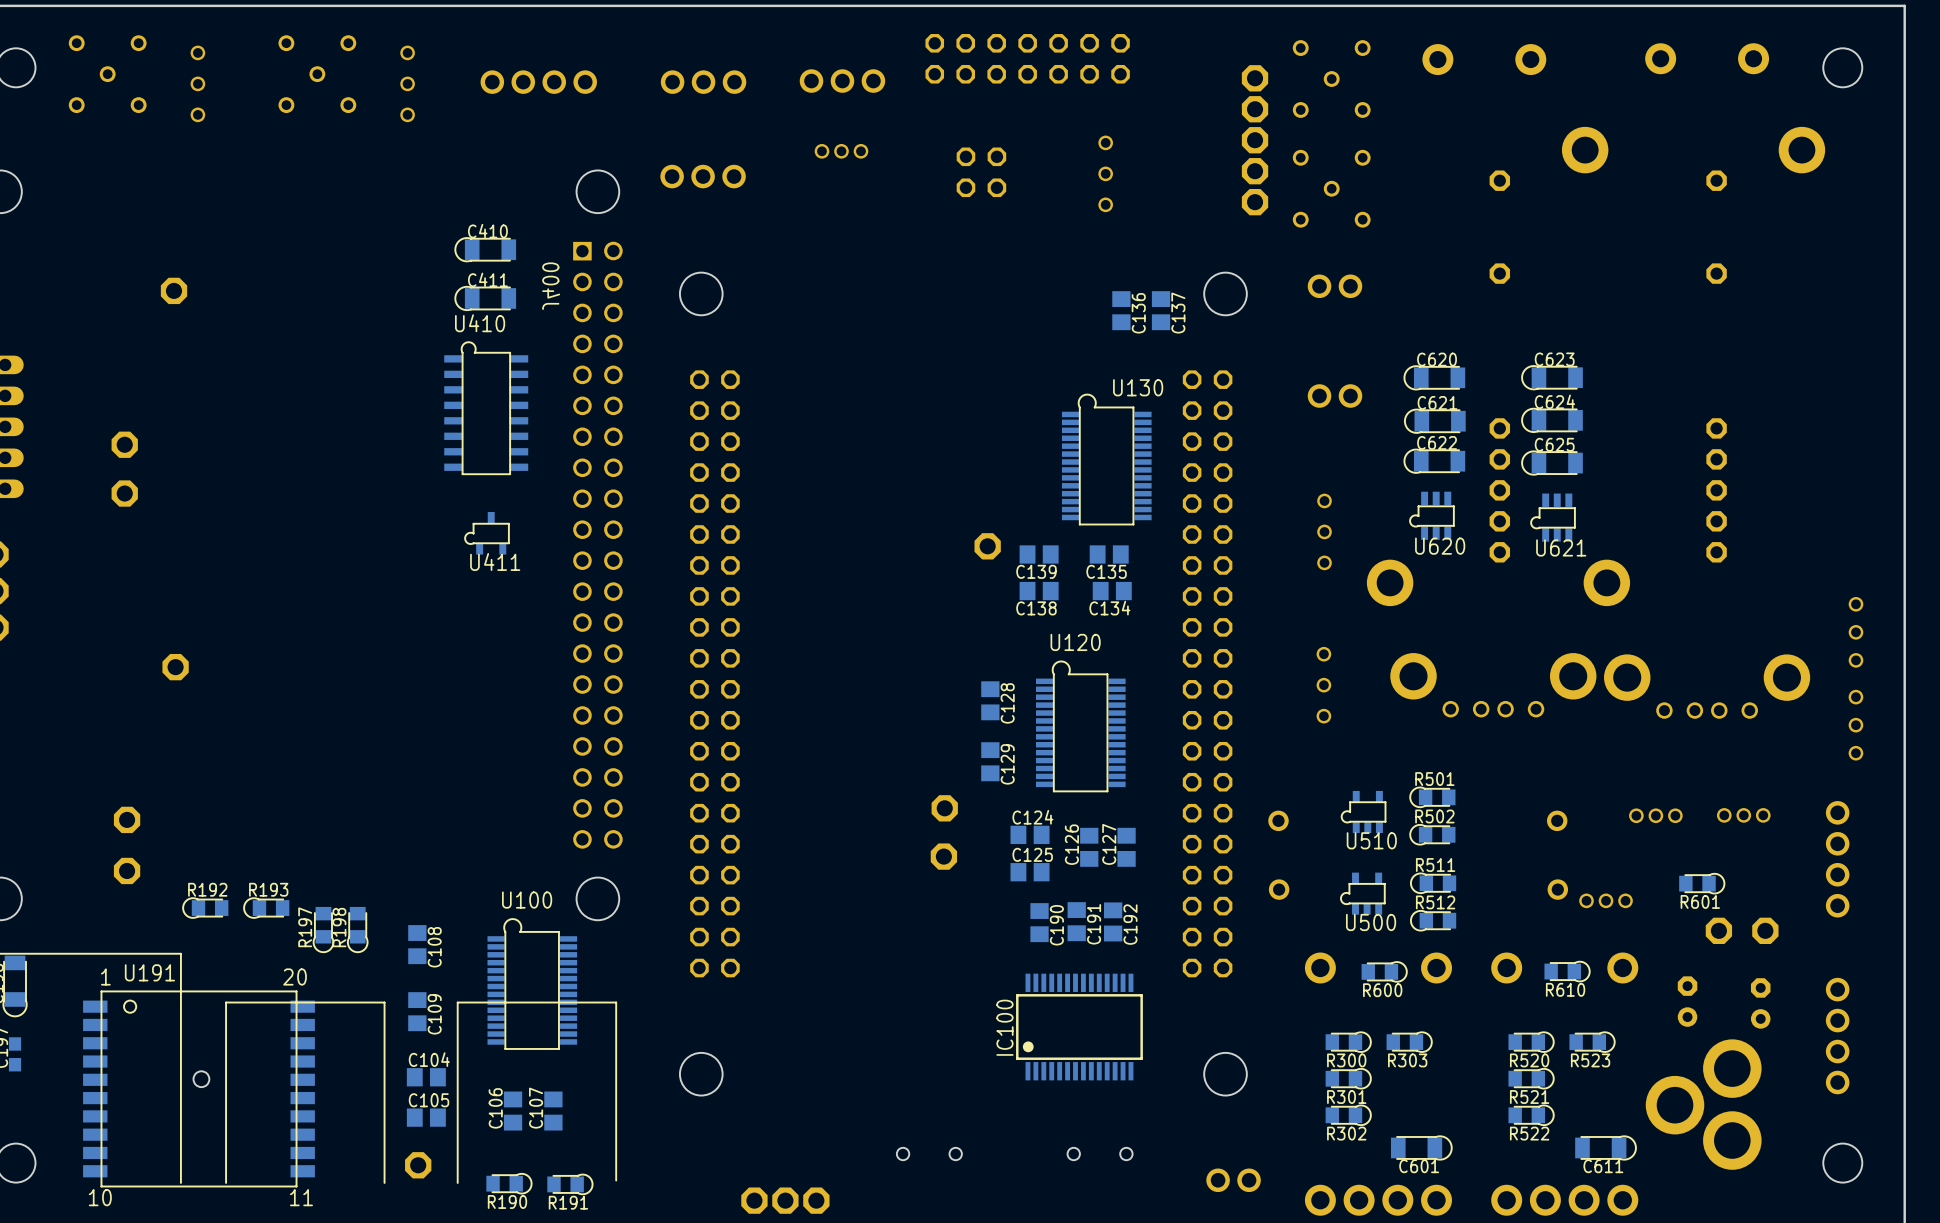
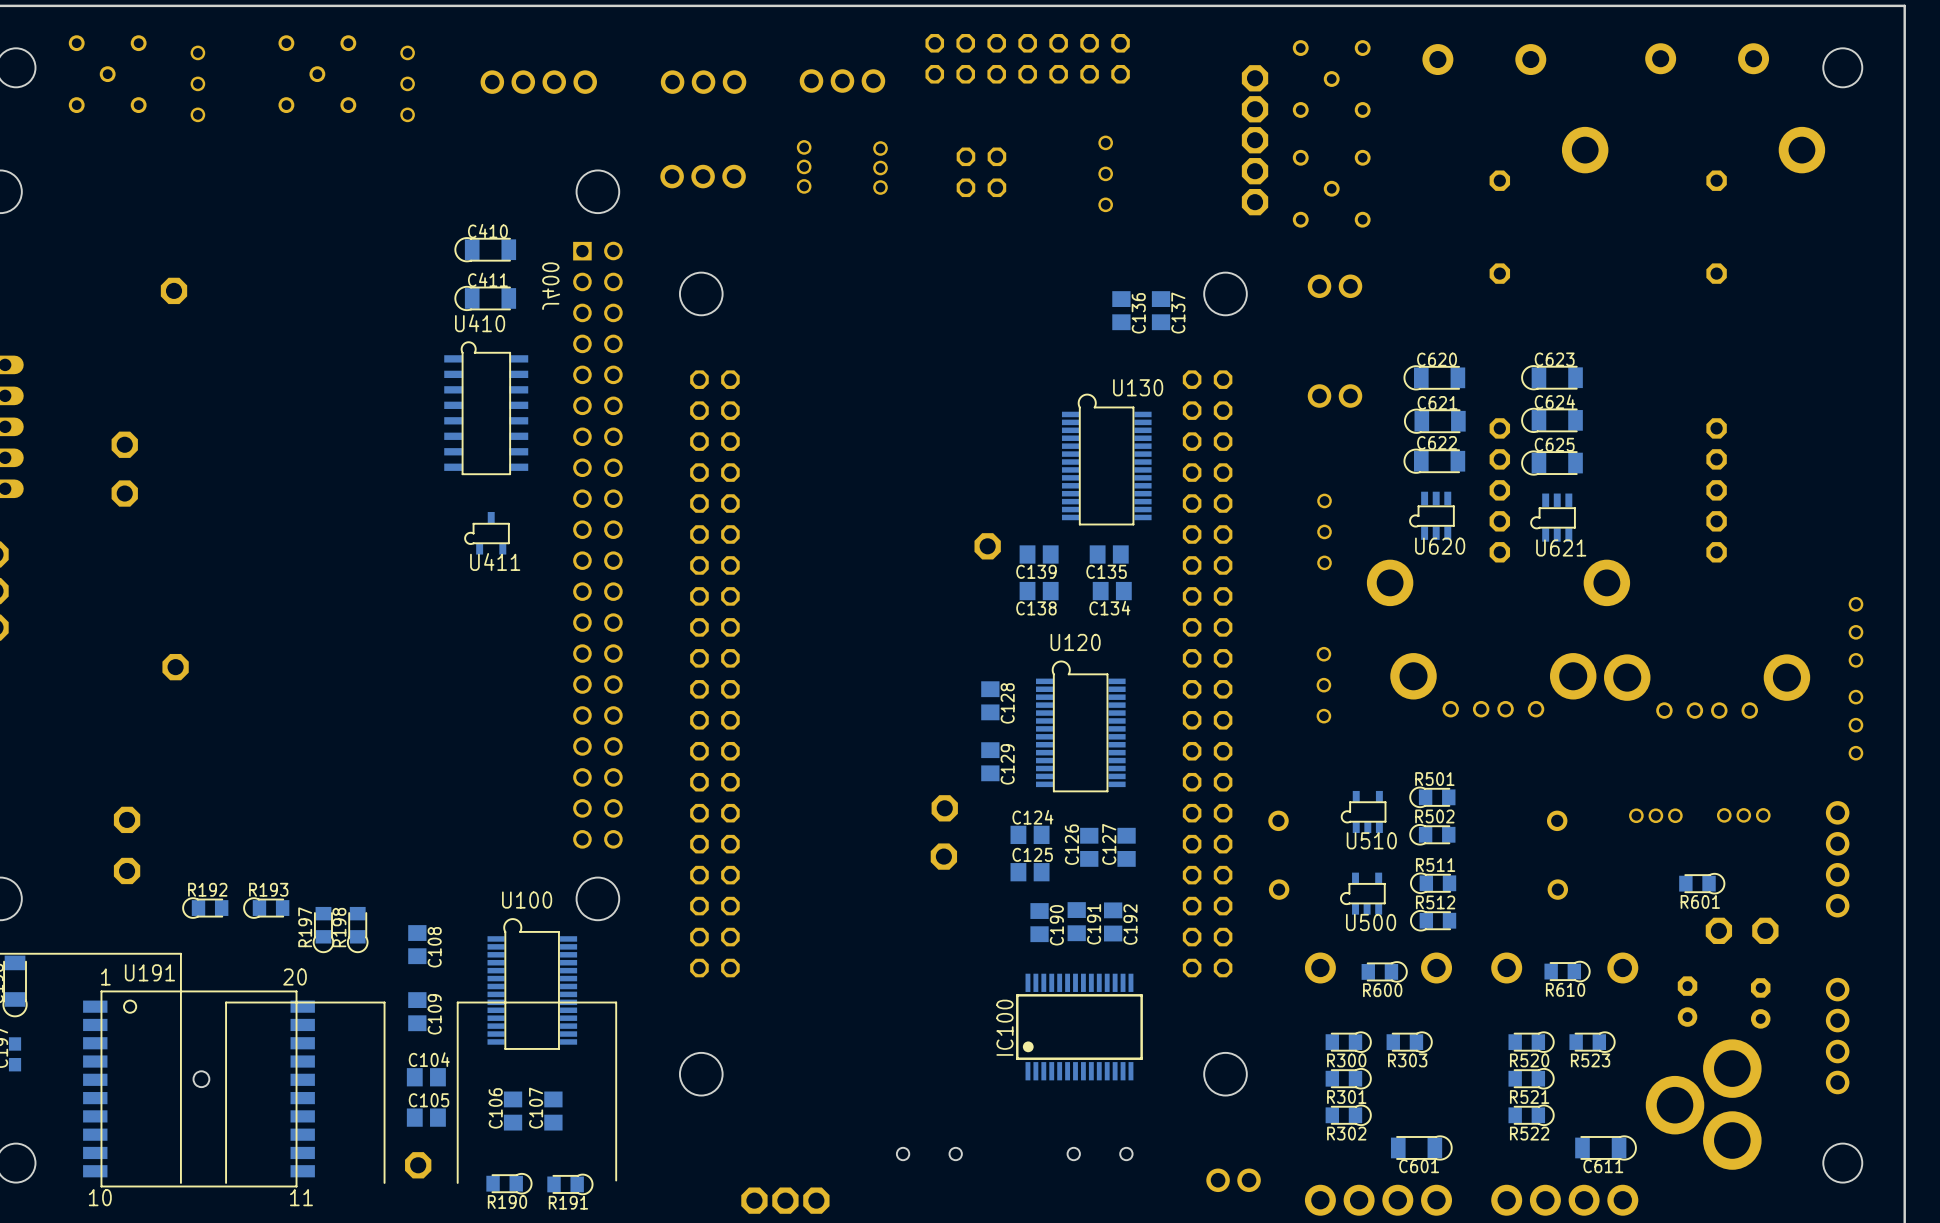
part: (841, 151) -> none
part: none -> (804, 166)
part: none -> (880, 168)
part: (1606, 900) -> none

